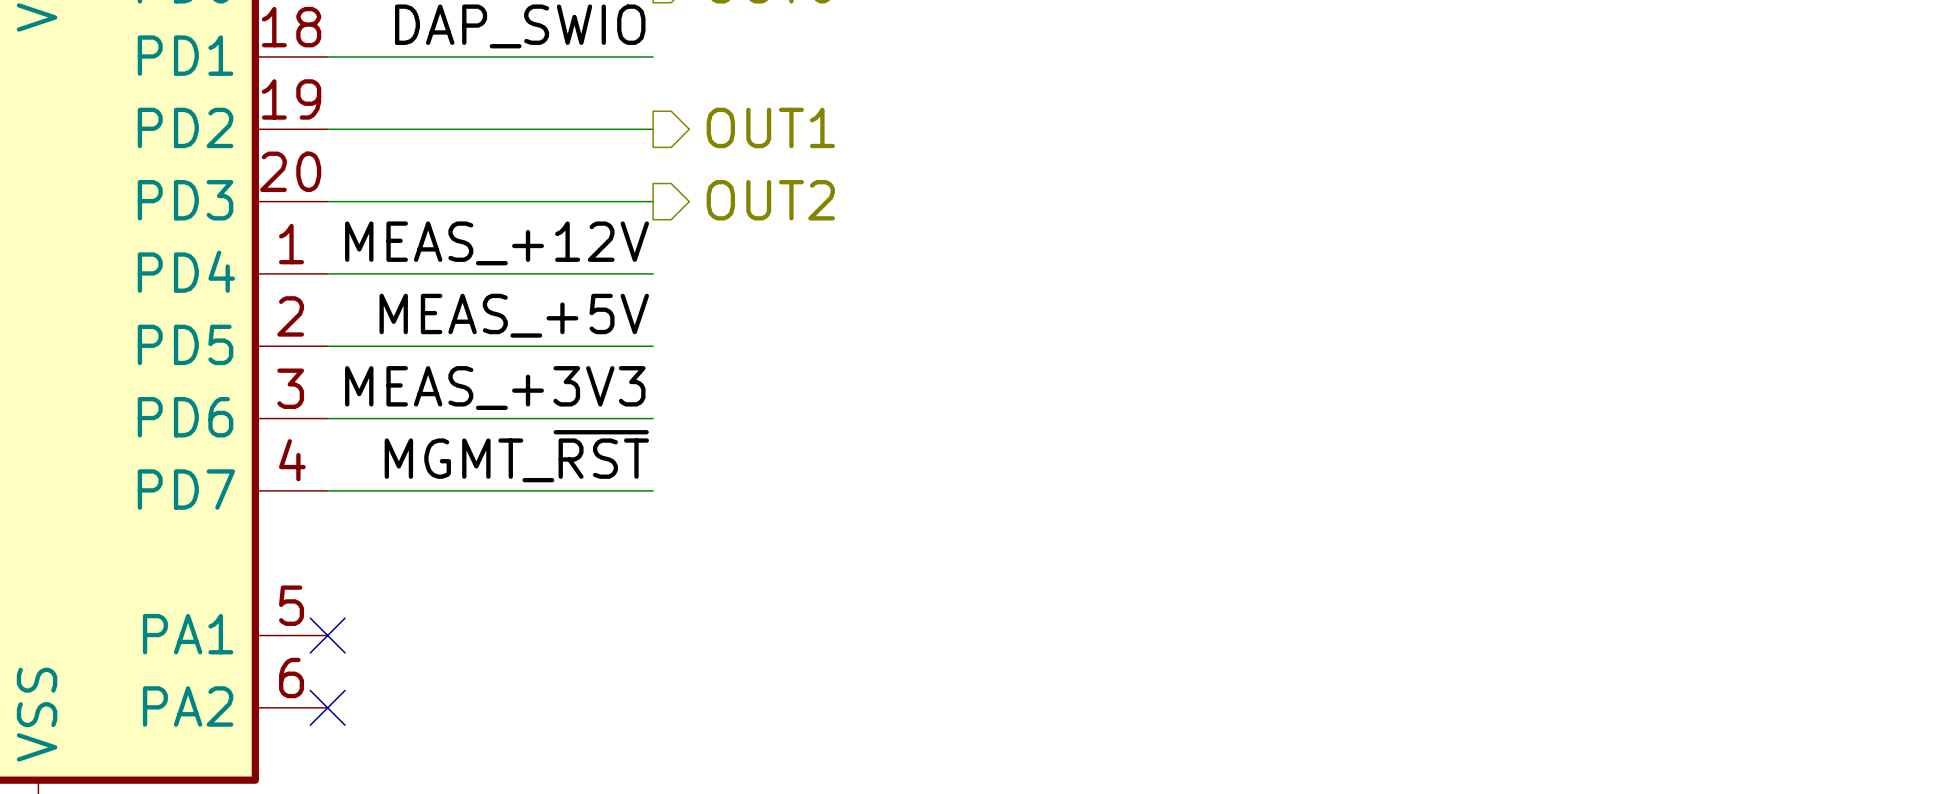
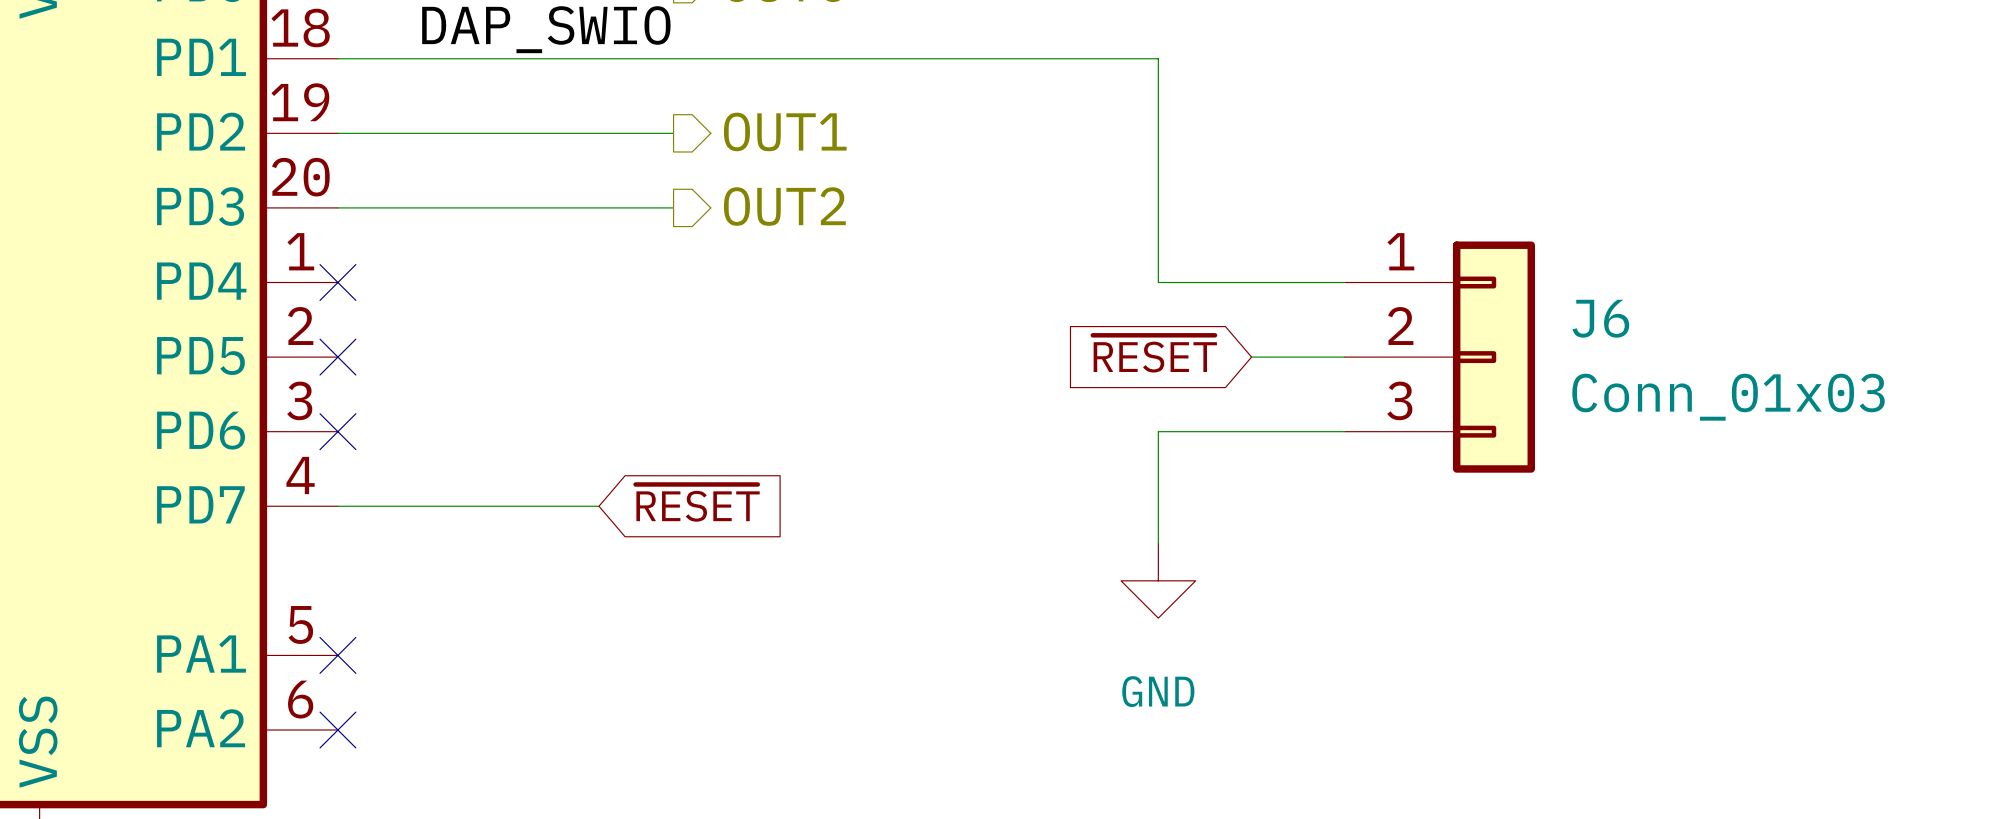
wire: none -> (673, 58) (1158, 58) (1158, 282) (1344, 282)
label: MEAS_+12V (497, 243) -> none
wire: (327, 273) (653, 273) -> none
no-connect mark: none -> (337, 282)
label: MEAS_+5V (514, 315) -> none
global label: none -> ~{RESET} (1154, 353)
wire: (327, 346) (653, 346) -> none
no-connect mark: none -> (337, 357)
wire: none -> (1251, 357) (1344, 357)
J6: none -> Conn_01x03 (1439, 357)
label: MEAS_+3V3 (495, 388) -> none
wire: (327, 418) (653, 418) -> none
no-connect mark: none -> (337, 431)
wire: none -> (1344, 431) (1158, 431) (1158, 543)
label: MGMT_~{RST} (516, 456) -> none
global label: none -> ~{RESET} (697, 503)
wire: (580, 490) (653, 490) -> none
power symbol: none -> GND (1158, 580)

